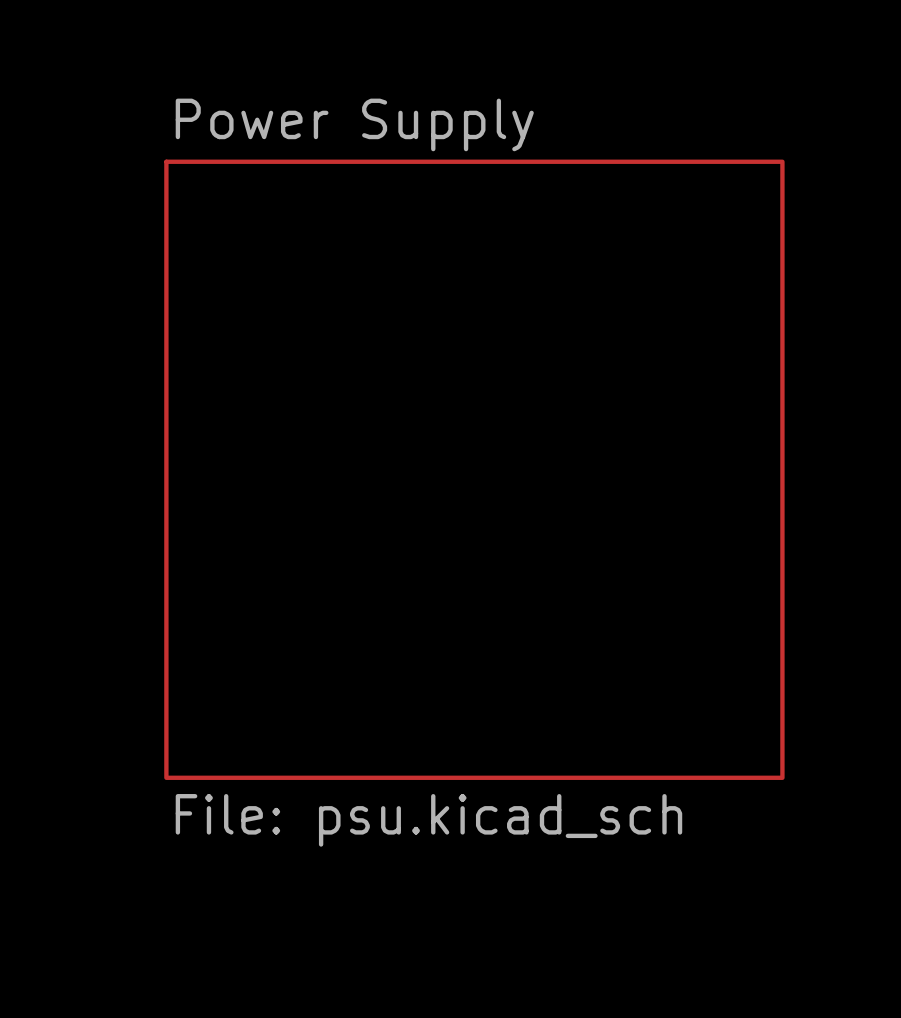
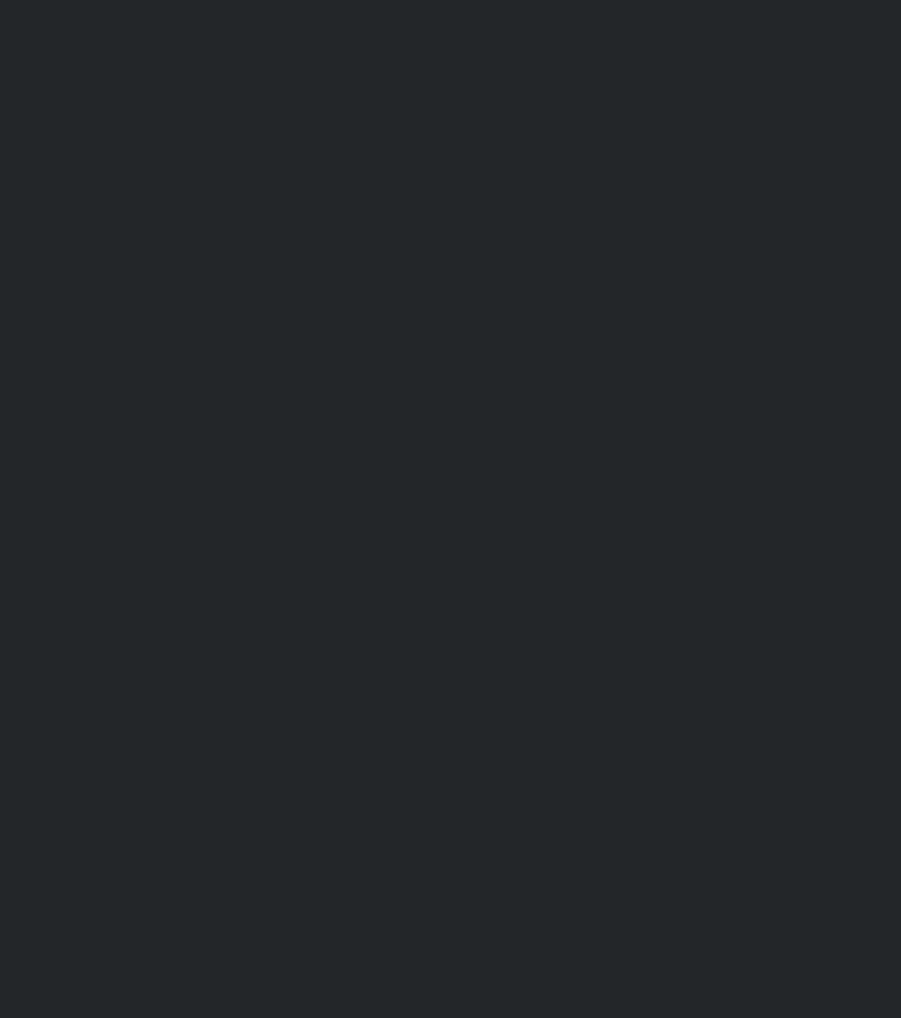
sheet Power Supply: File: psu.kicad_sch (474, 469) -> none

